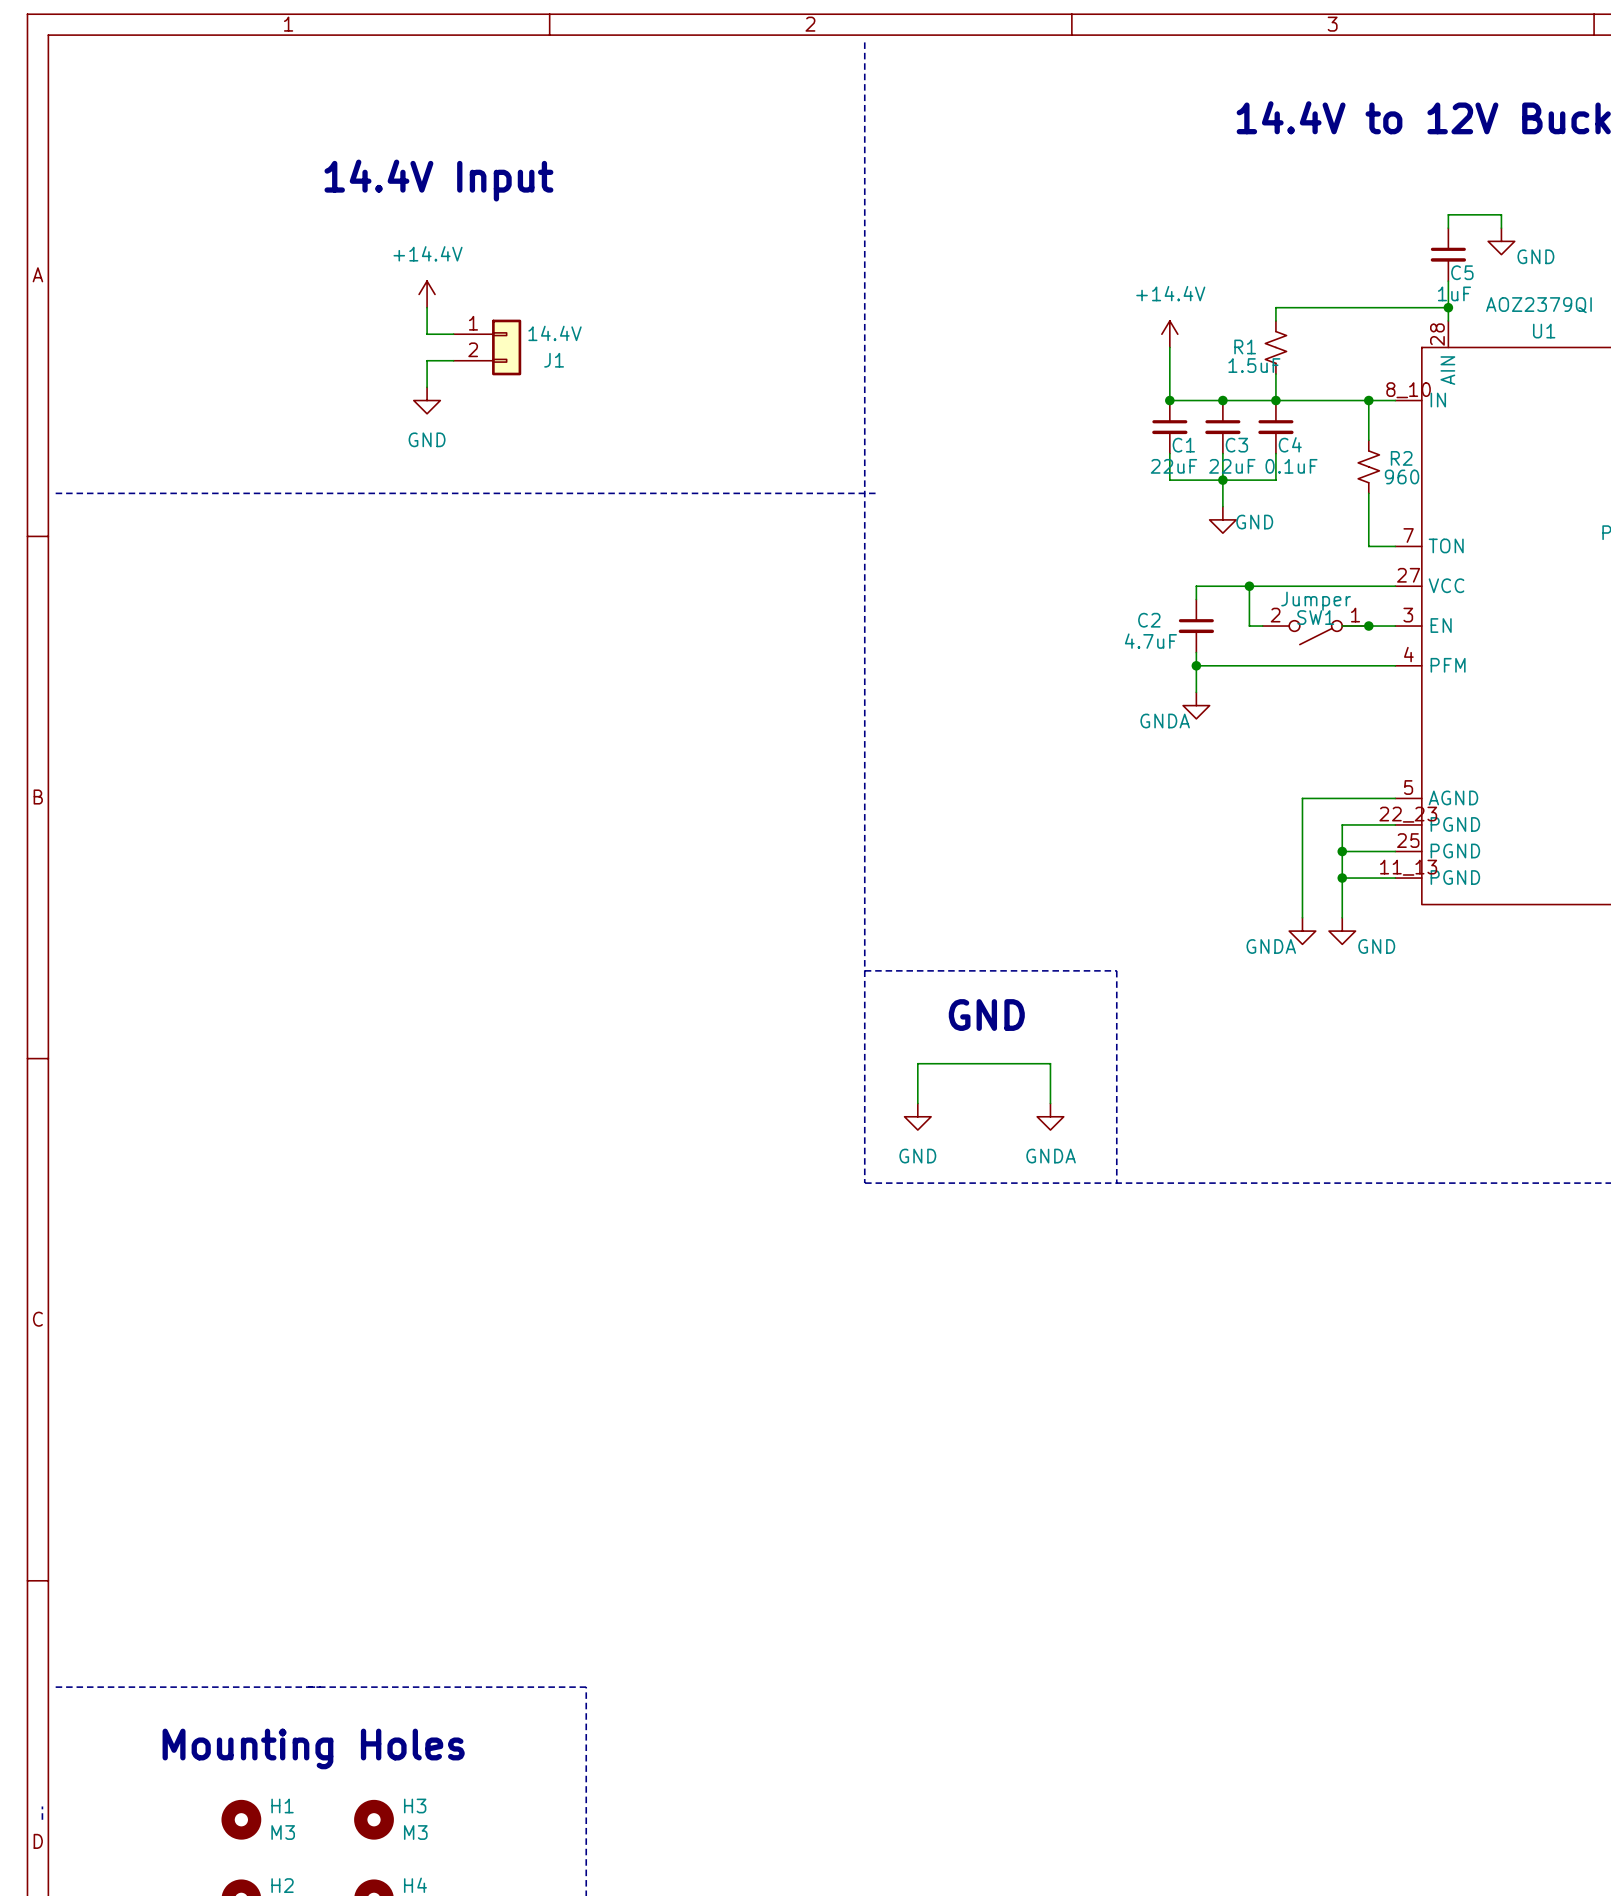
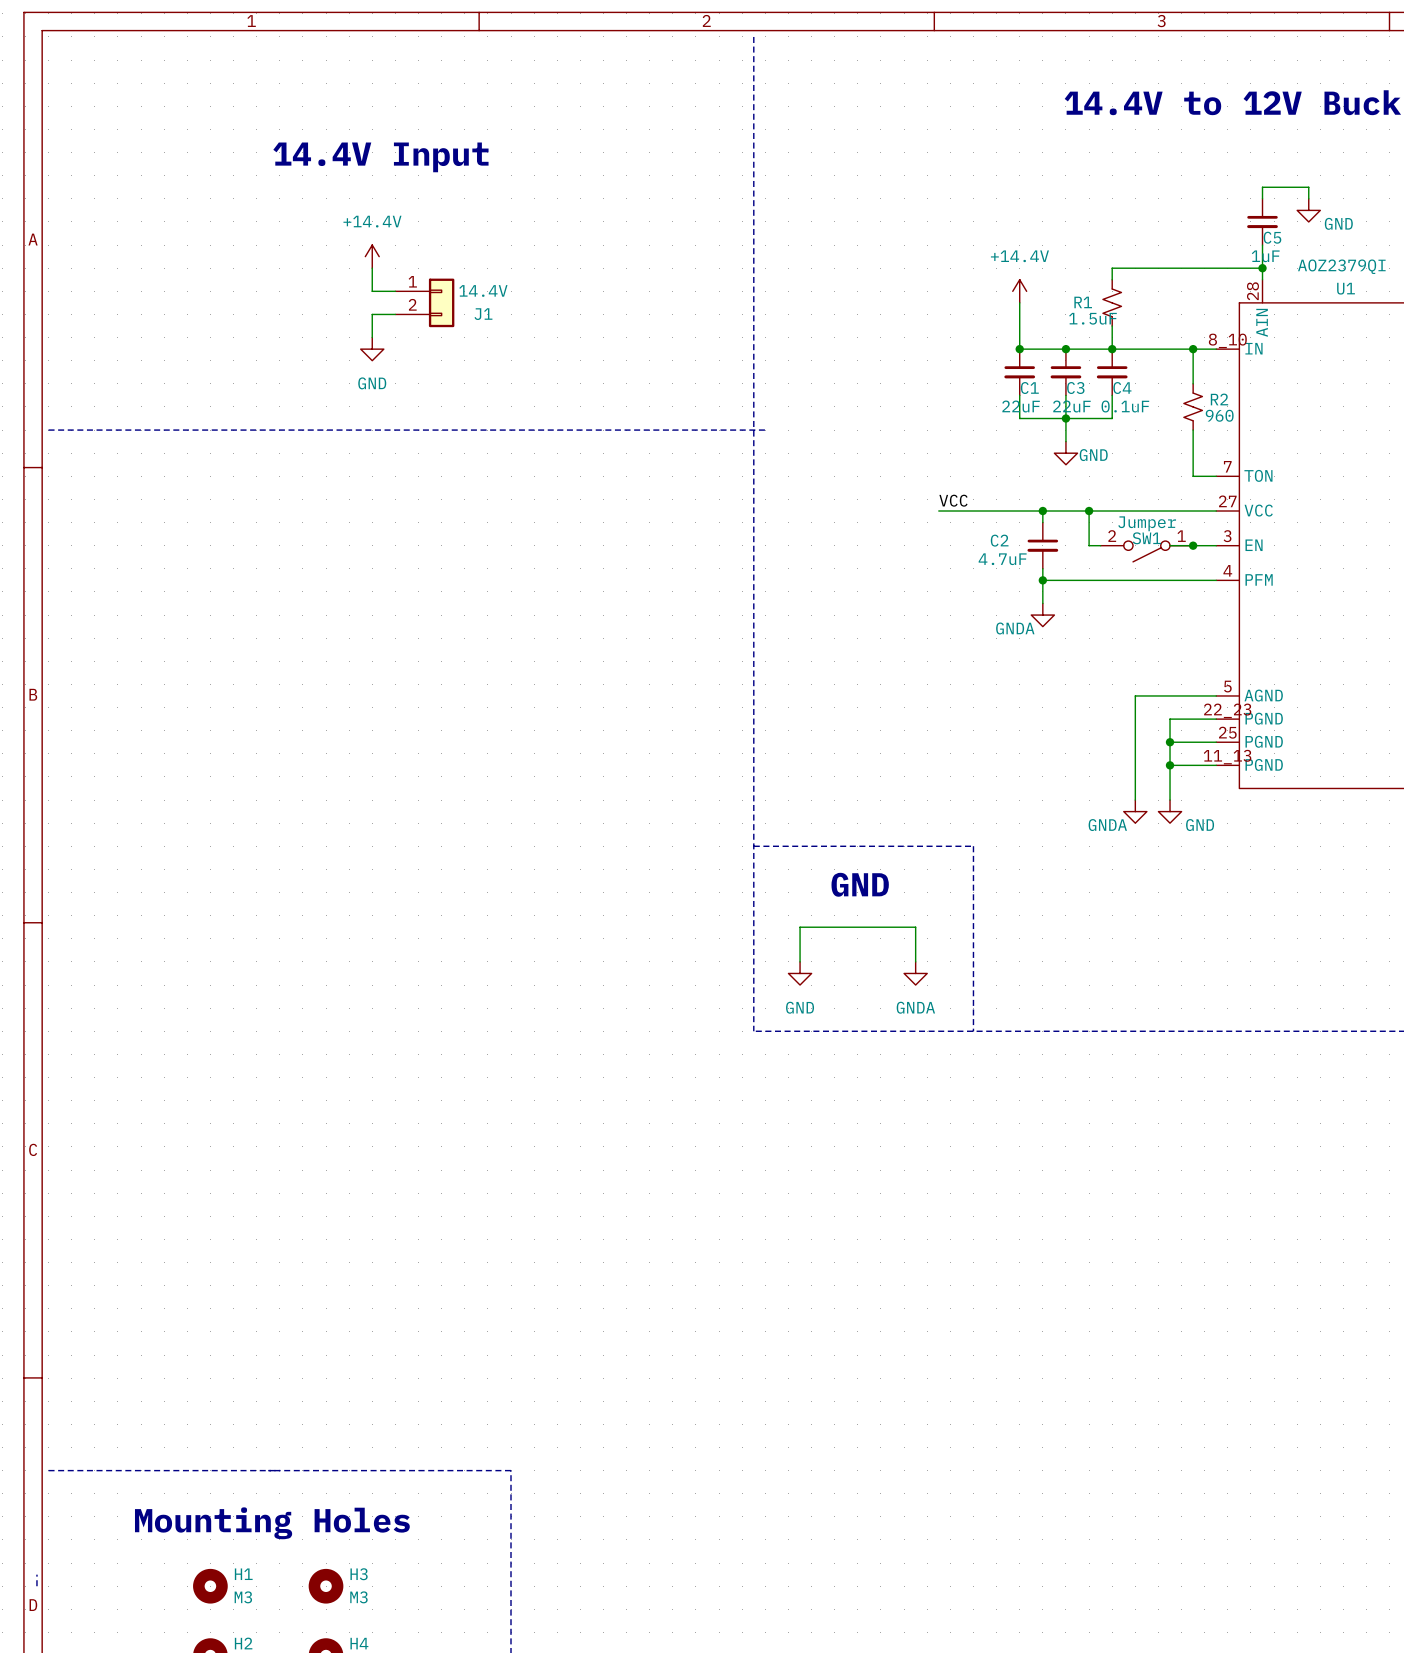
label: none -> VCC (953, 500)
wire: none -> (938, 511) (1042, 511)
junction: none -> (1042, 511)

